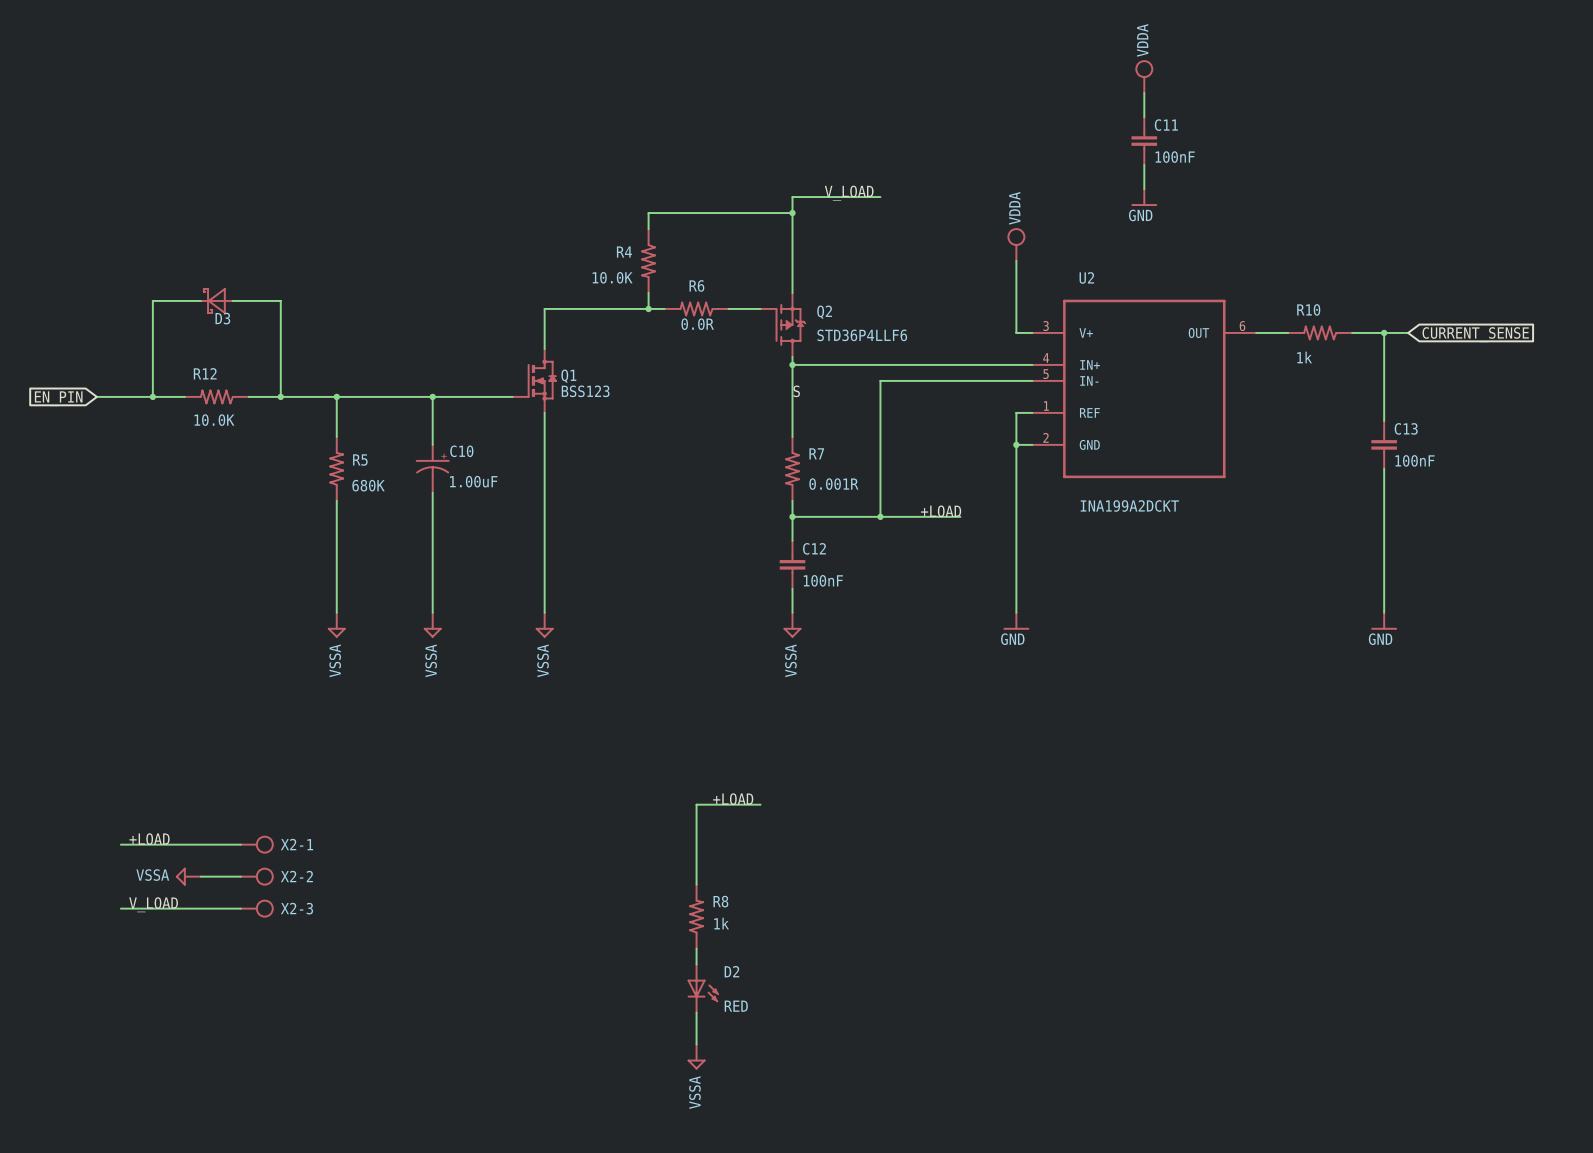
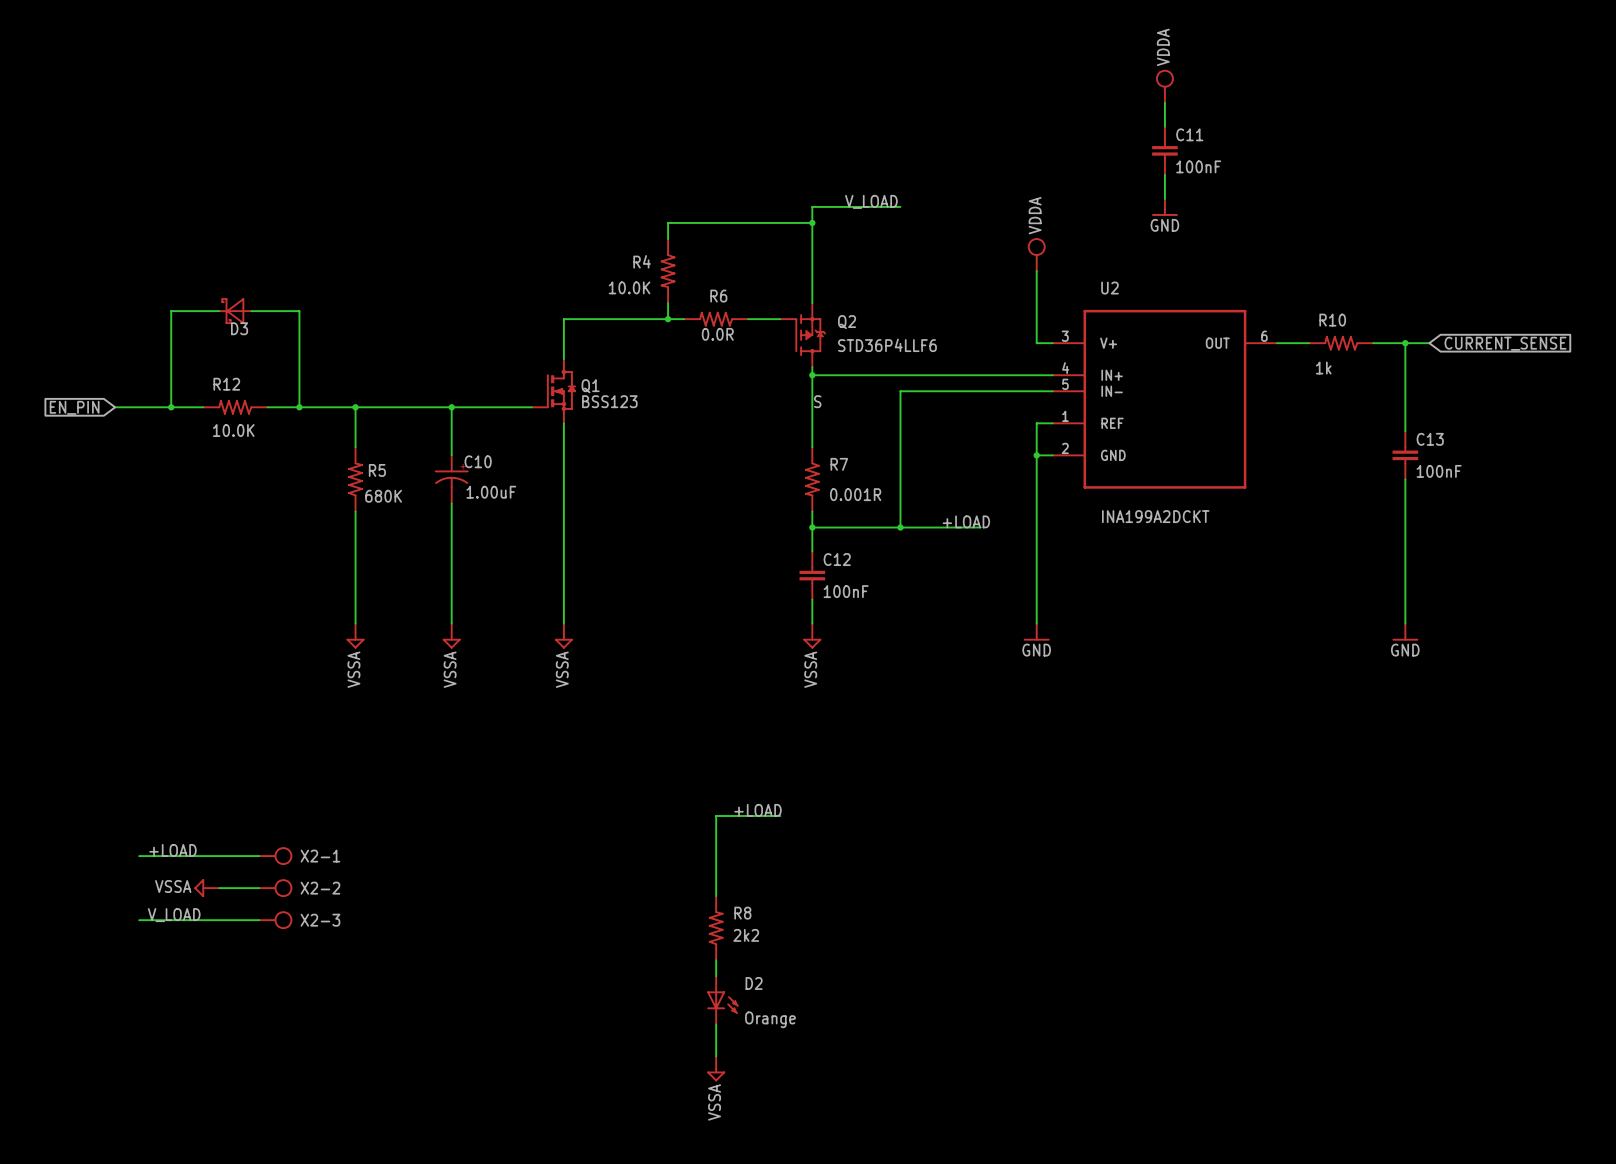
R8 value: 1k (721, 923) -> 2k2 (746, 935)
D2 value: RED (736, 1006) -> Orange (770, 1019)

